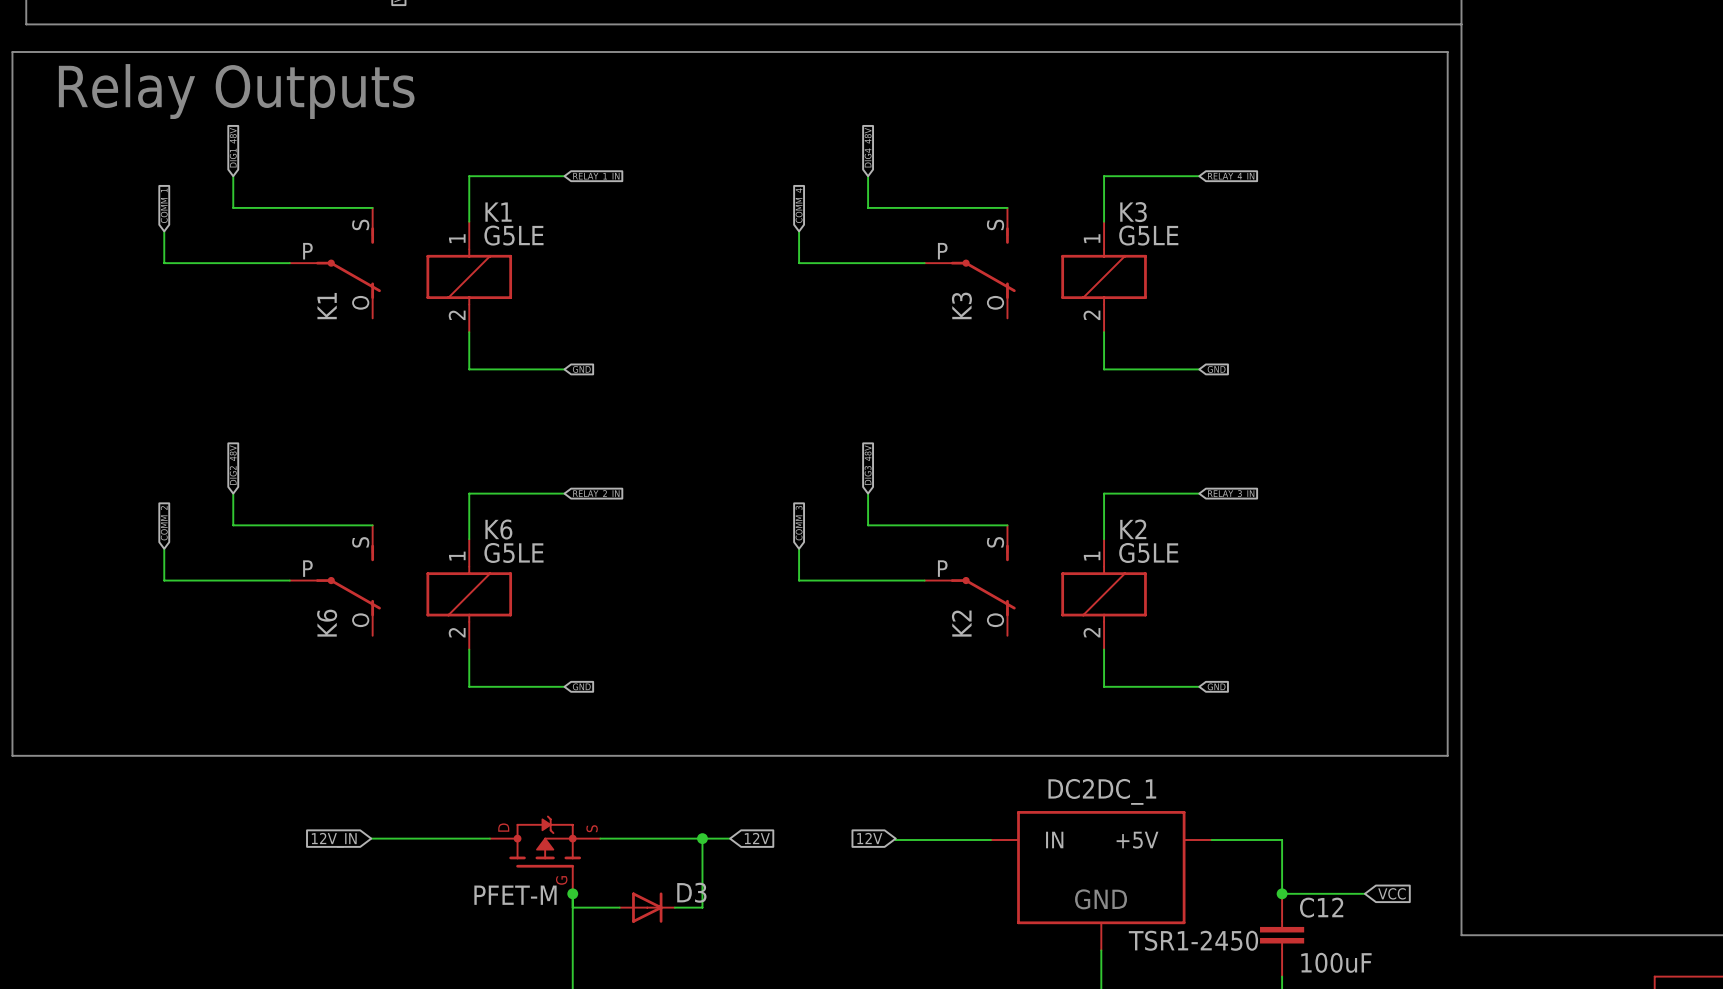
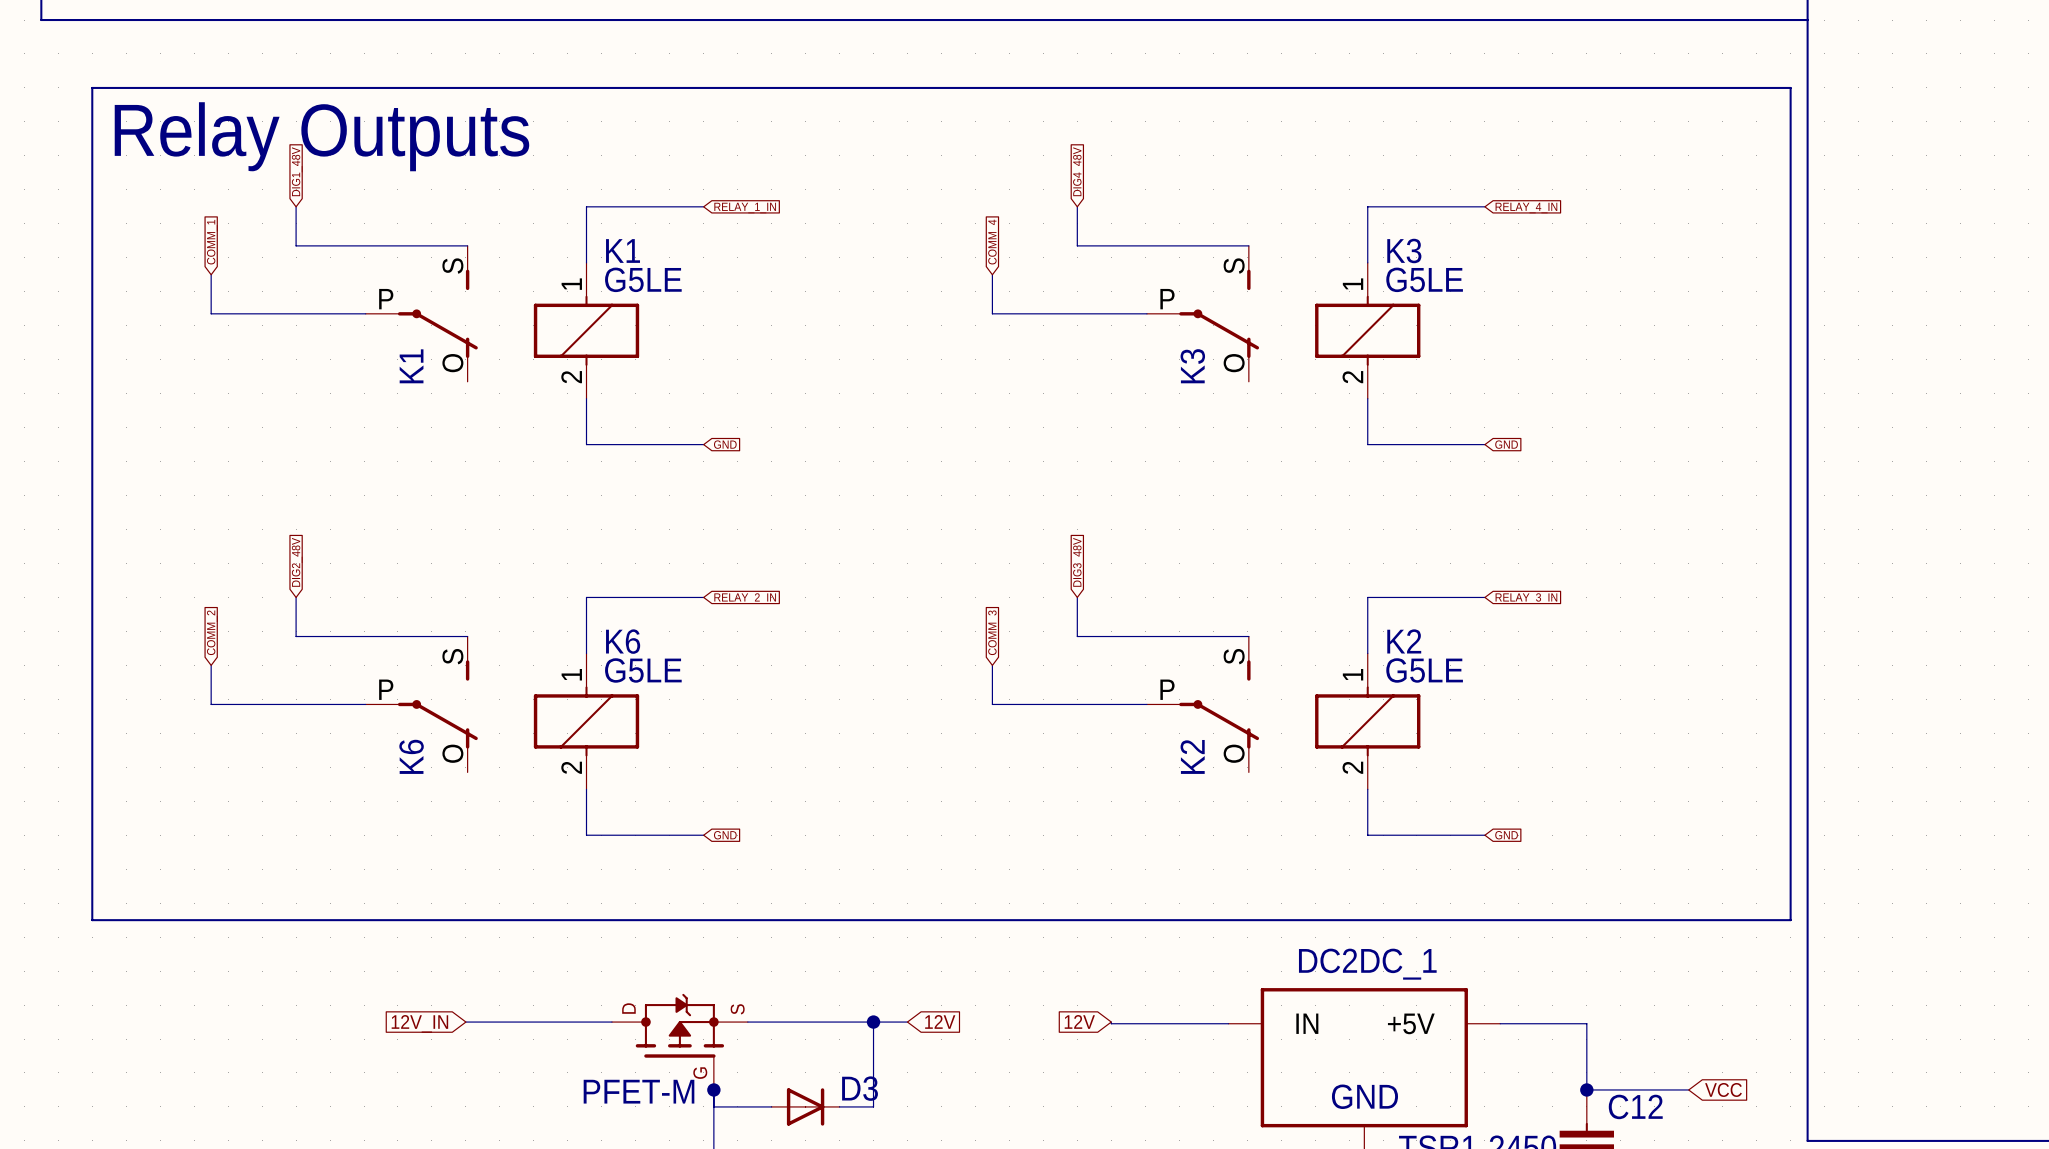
line: (1447, 79) (1447, 52) (12, 52) (12, 755) (67, 755) -> (1790, 87) (92, 87) (92, 920)
text position: Relay Outputs (236, 91) -> Relay Outputs (321, 136)

